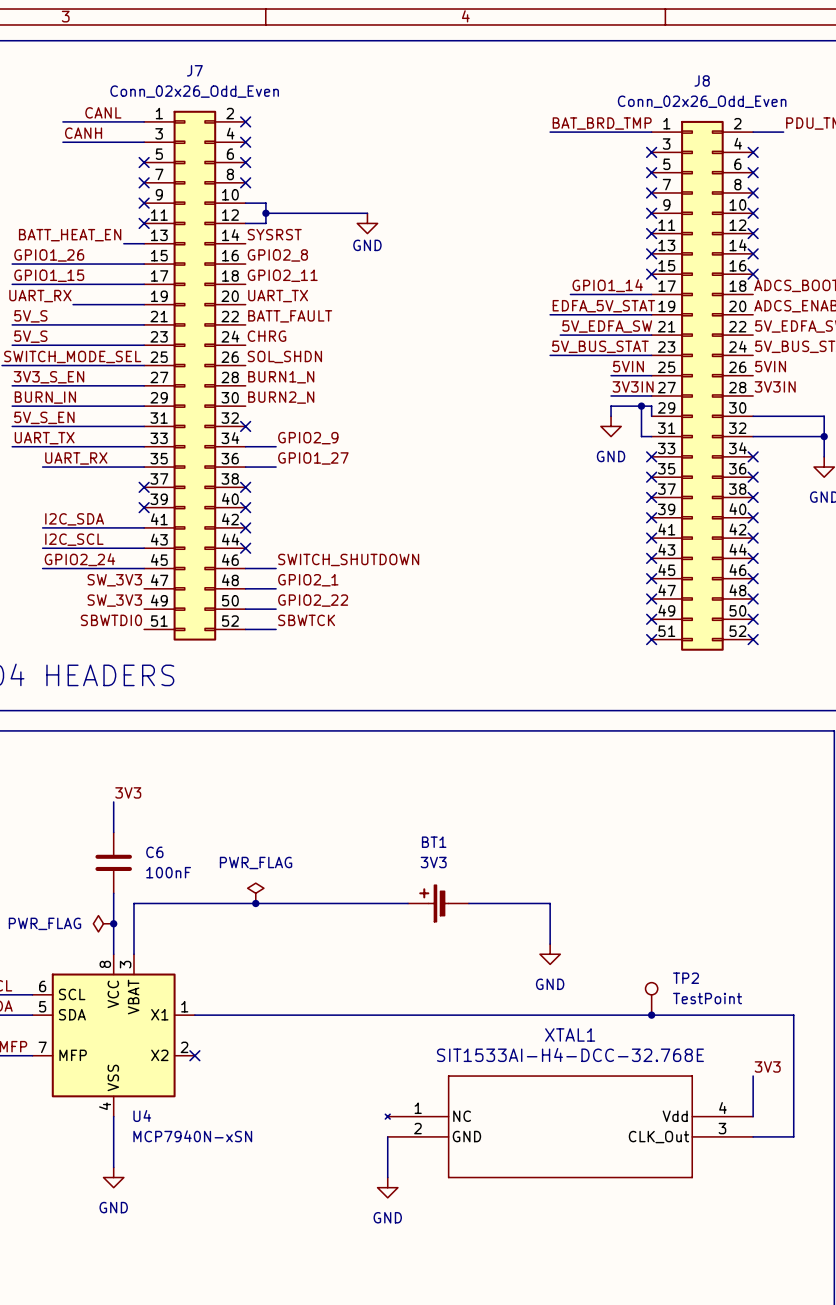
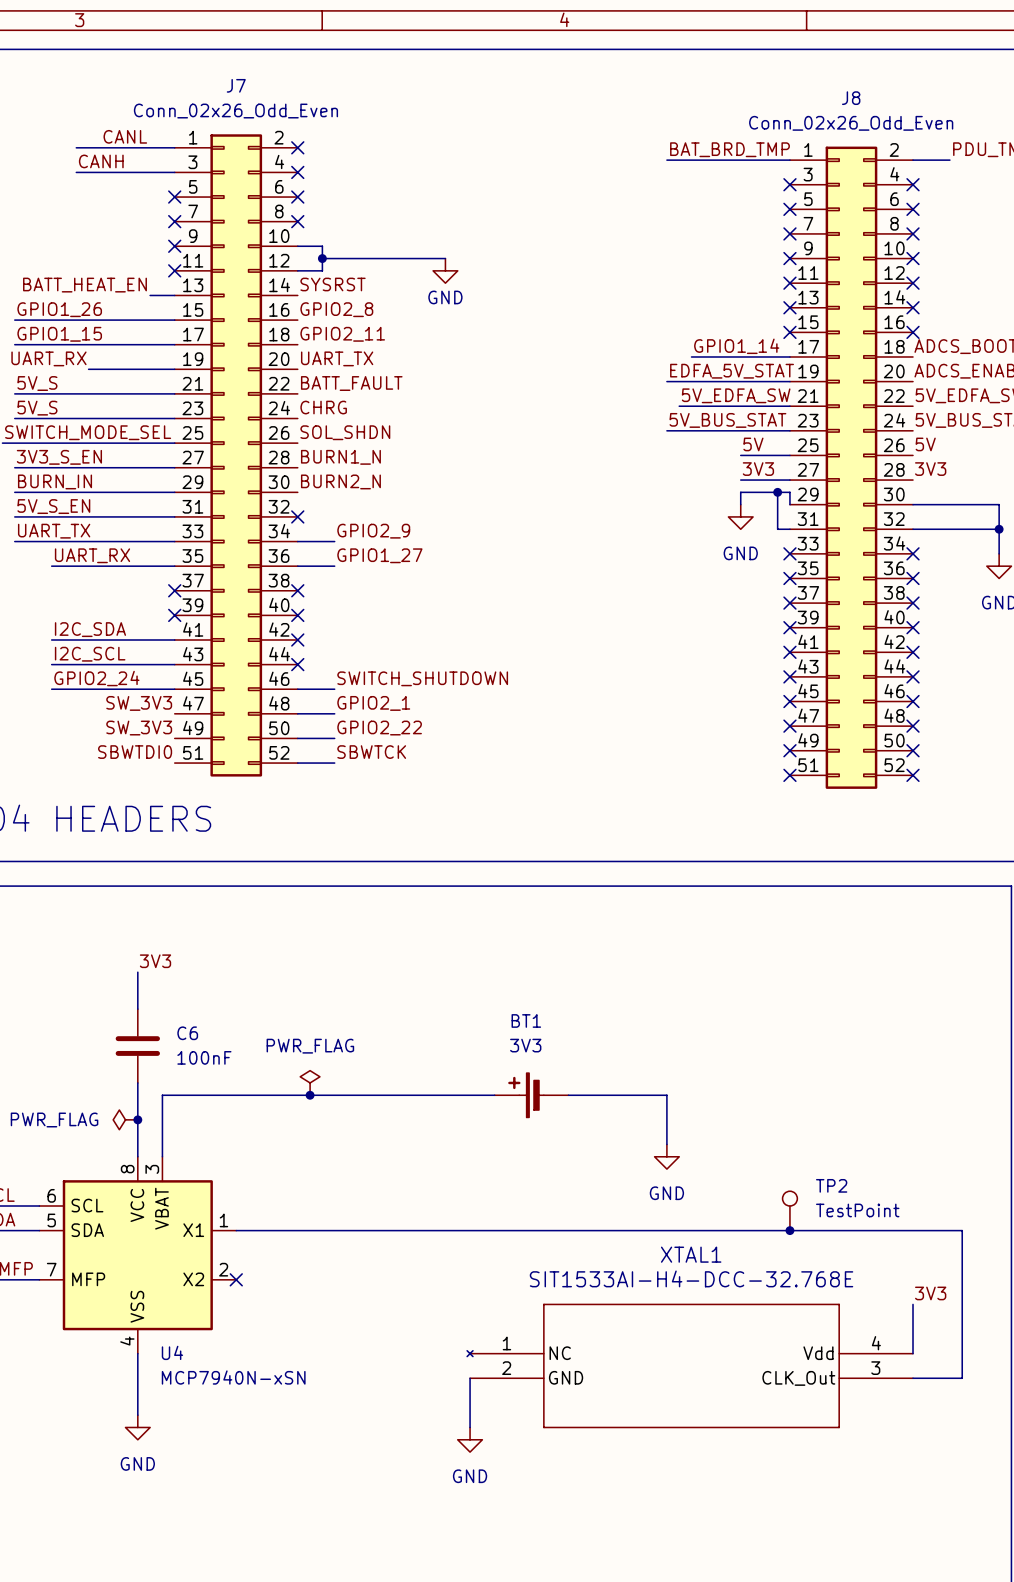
label: 5VIN (628, 366) -> 5V (753, 444)
label: 5VIN (770, 366) -> 5V (925, 444)
label: 3V3IN (633, 386) -> 3V3 (758, 469)
label: 3V3IN (775, 386) -> 3V3 (930, 469)

